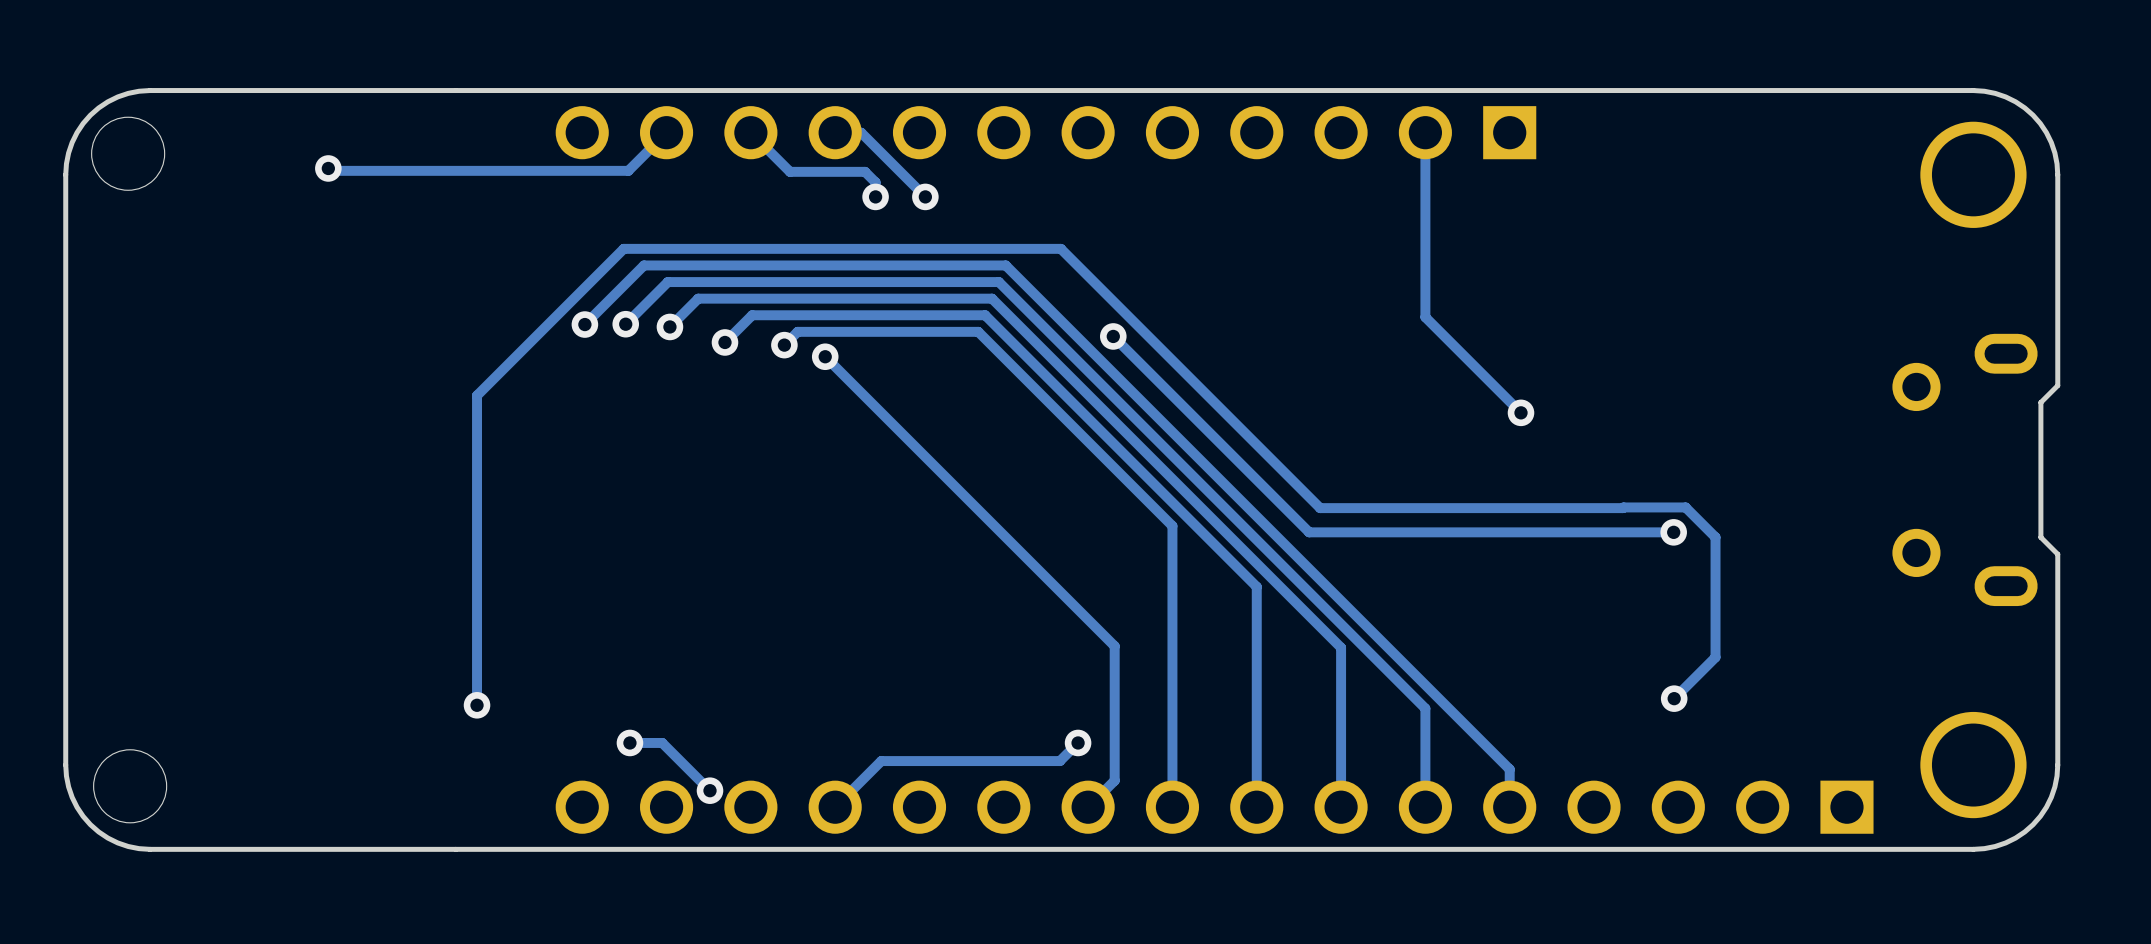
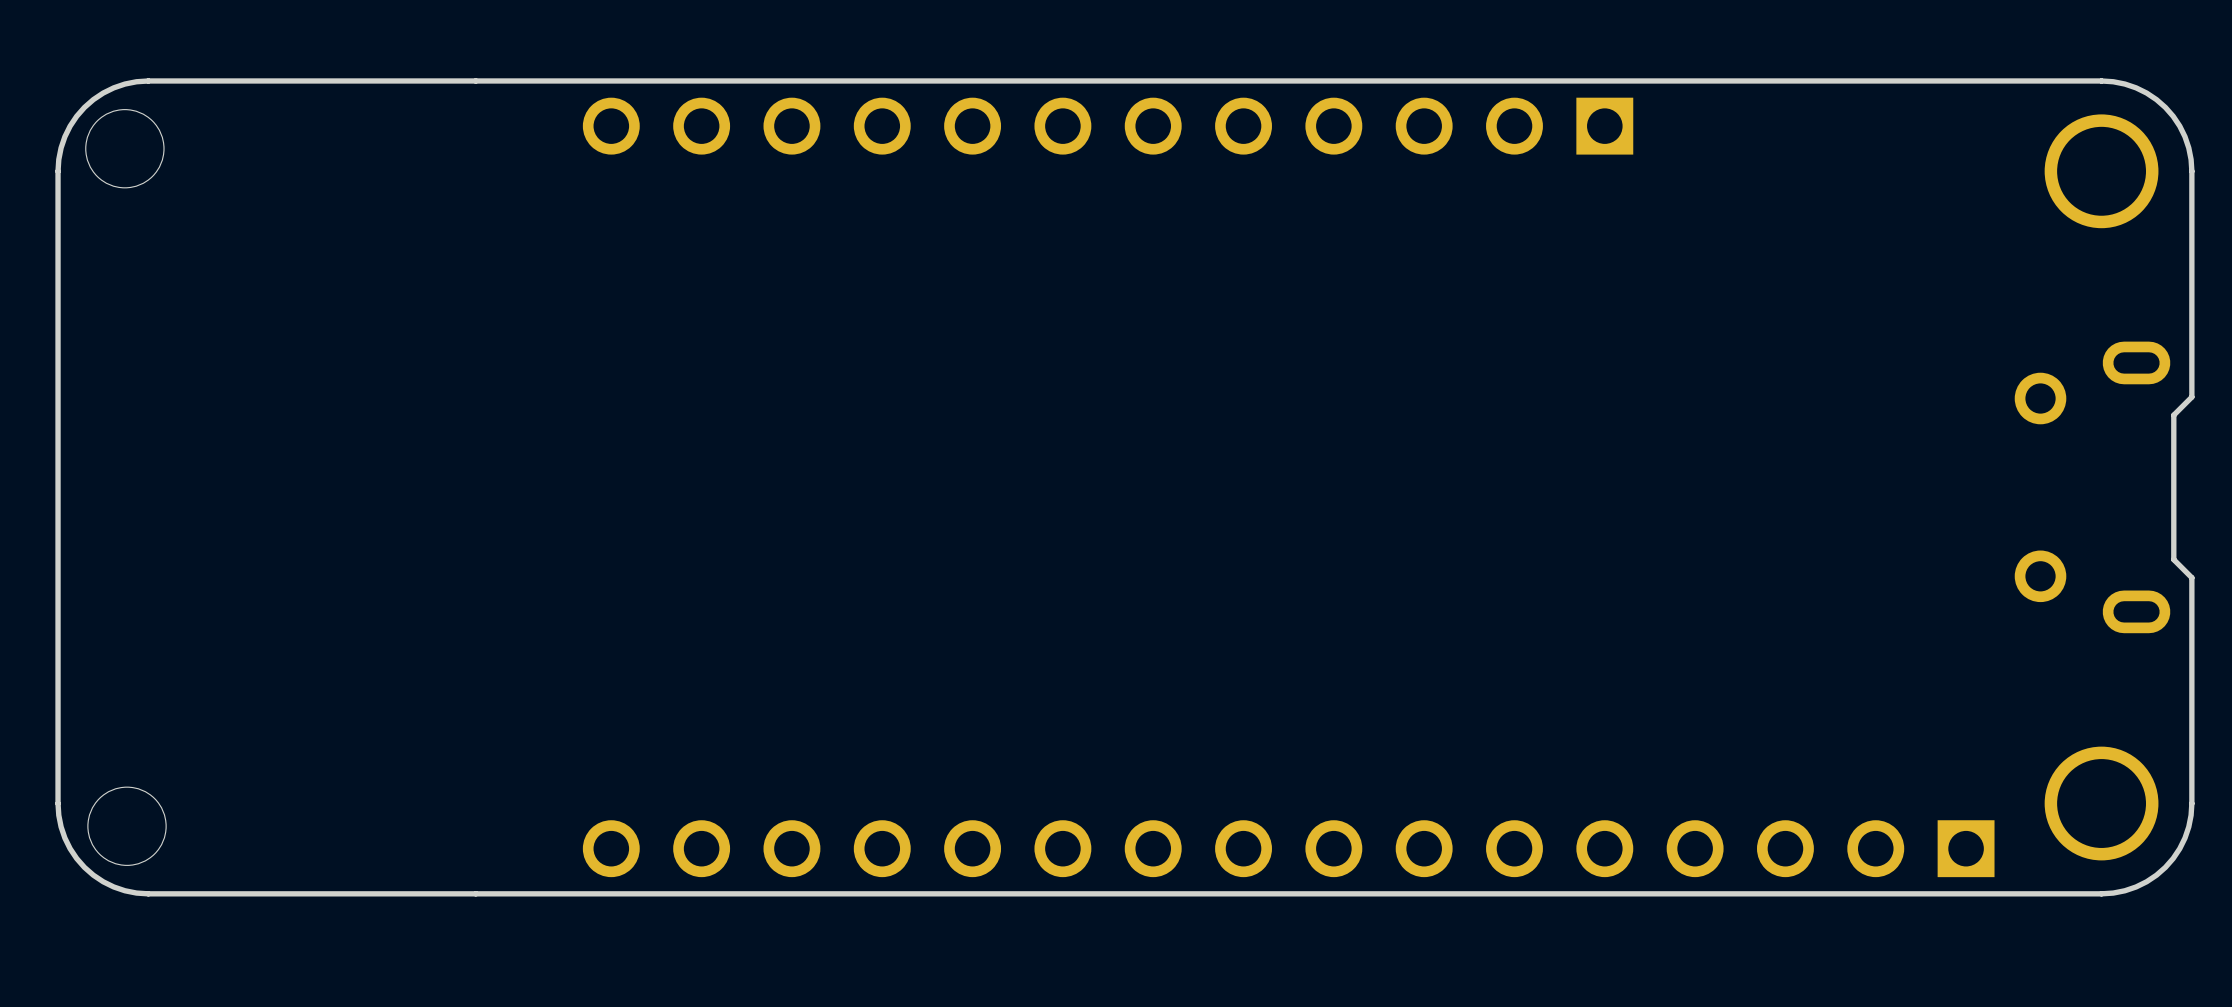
track: (666, 132) (628, 170) (330, 170) (328, 168) -> none
track: (750, 132) (790, 171) (865, 171) (875, 182) (875, 196) -> none
track: (835, 132) (861, 132) (925, 196) -> none
track: (1425, 132) (1425, 317) (1521, 412) -> none
via: (328, 168) -> none
via: (875, 196) -> none
via: (925, 196) -> none
track: (584, 324) (643, 265) (1005, 265) (1509, 769) (1509, 807) -> none
via: (584, 324) -> none
track: (625, 324) (667, 282) (998, 282) (1425, 708) (1425, 807) -> none
via: (625, 324) -> none
track: (669, 326) (698, 298) (992, 298) (1341, 647) (1341, 807) -> none
via: (669, 326) -> none
track: (1113, 336) (1309, 532) (1673, 532) -> none
via: (1113, 336) -> none
track: (724, 342) (752, 315) (985, 315) (1256, 586) (1256, 807) -> none
via: (724, 342) -> none
track: (784, 345) (797, 331) (978, 331) (1172, 526) (1172, 807) -> none
via: (784, 345) -> none
track: (825, 356) (1114, 646) (1114, 780) (1088, 807) -> none
via: (825, 356) -> none
via: (1521, 412) -> none
via: (1673, 532) -> none
track: (1674, 698) (1715, 657) (1715, 537) (1685, 507) (1320, 508) (1060, 248) (623, 248) (477, 395) (477, 705) -> none
via: (1674, 698) -> none
via: (477, 705) -> none
track: (629, 742) (662, 742) (710, 790) -> none
via: (629, 742) -> none
track: (1078, 742) (1059, 761) (881, 761) (835, 807) -> none
via: (1078, 742) -> none
via: (710, 790) -> none

